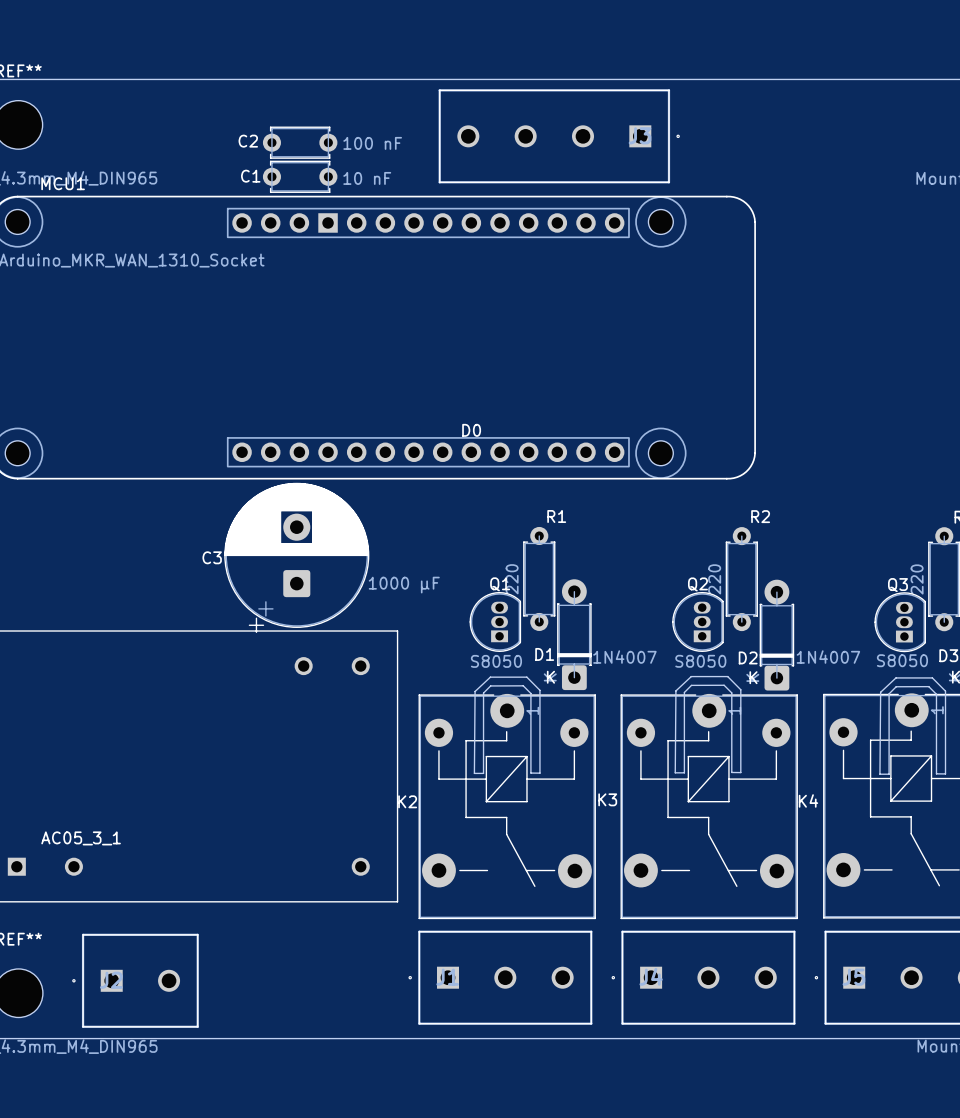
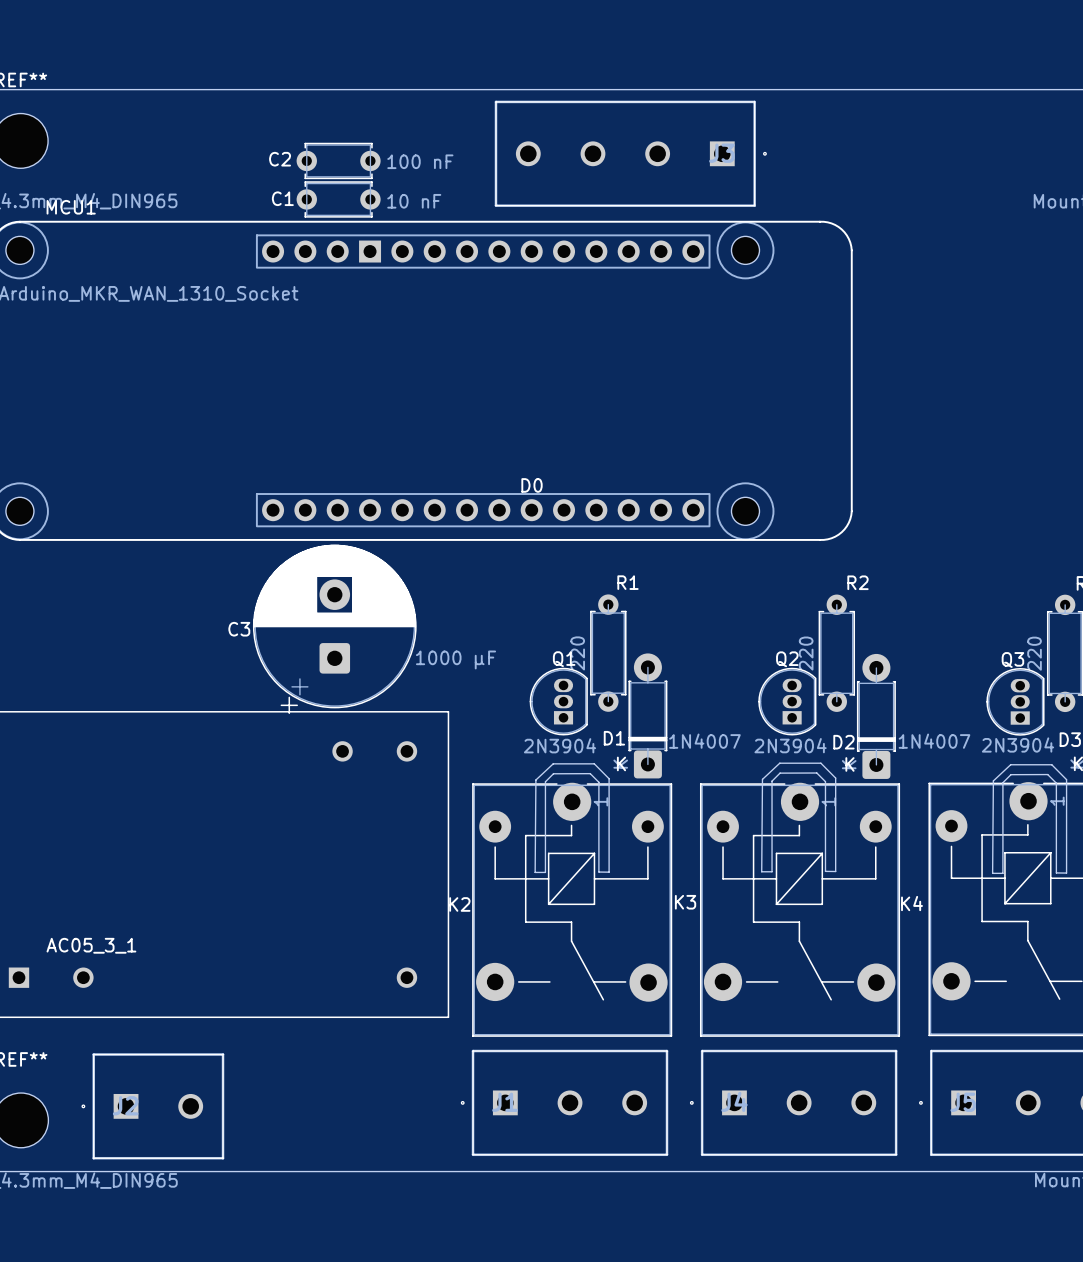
Q3 value: S8050 (902, 660) -> 2N3904 (1018, 745)
Q1 value: S8050 (496, 661) -> 2N3904 (560, 745)
Q2 value: S8050 (700, 661) -> 2N3904 (790, 745)

